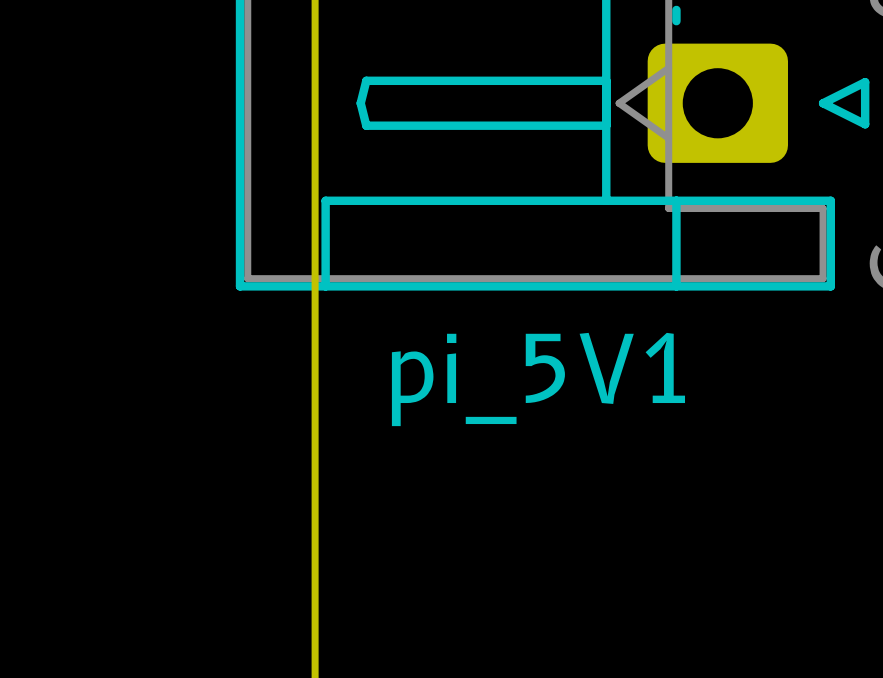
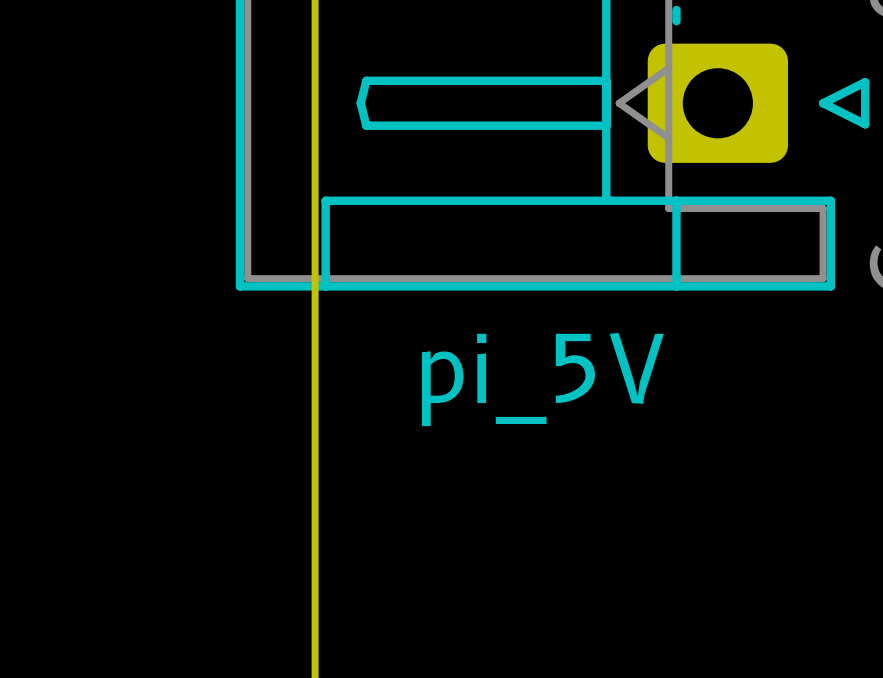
pi_5V1 name: pi_5V1 (538, 379) -> pi_5V (542, 379)

